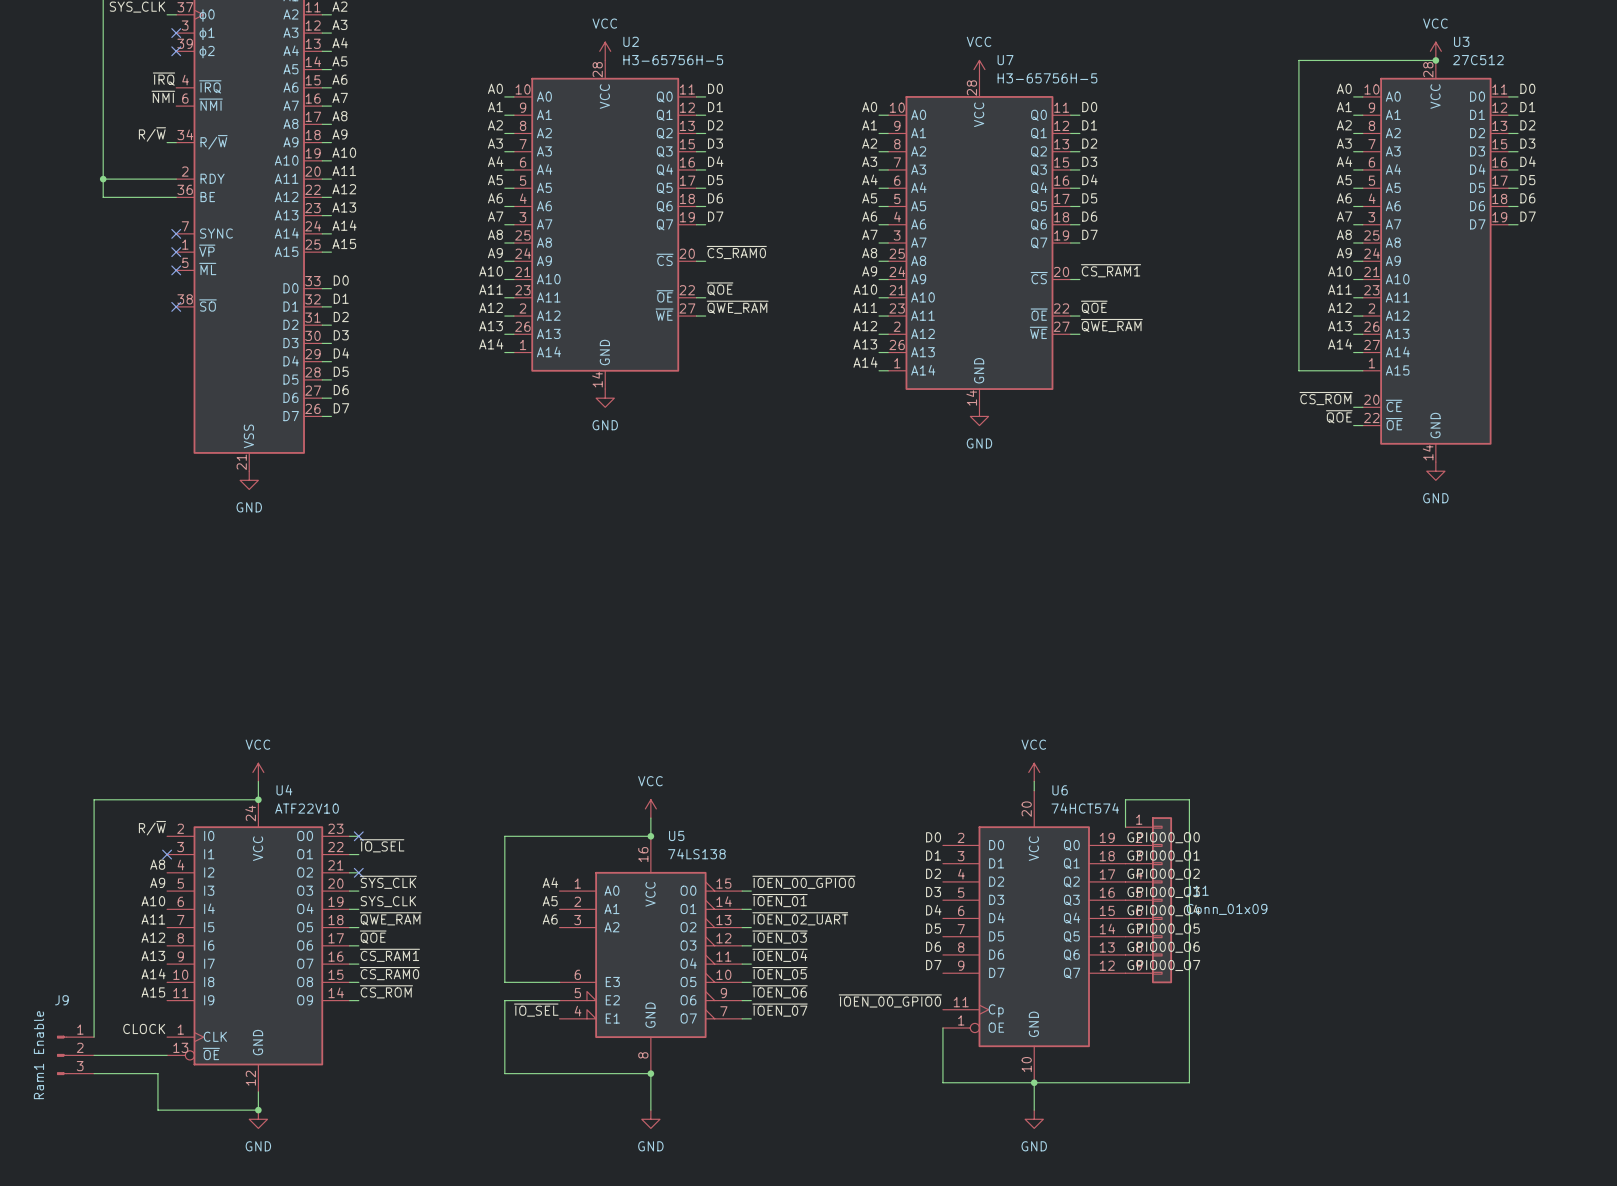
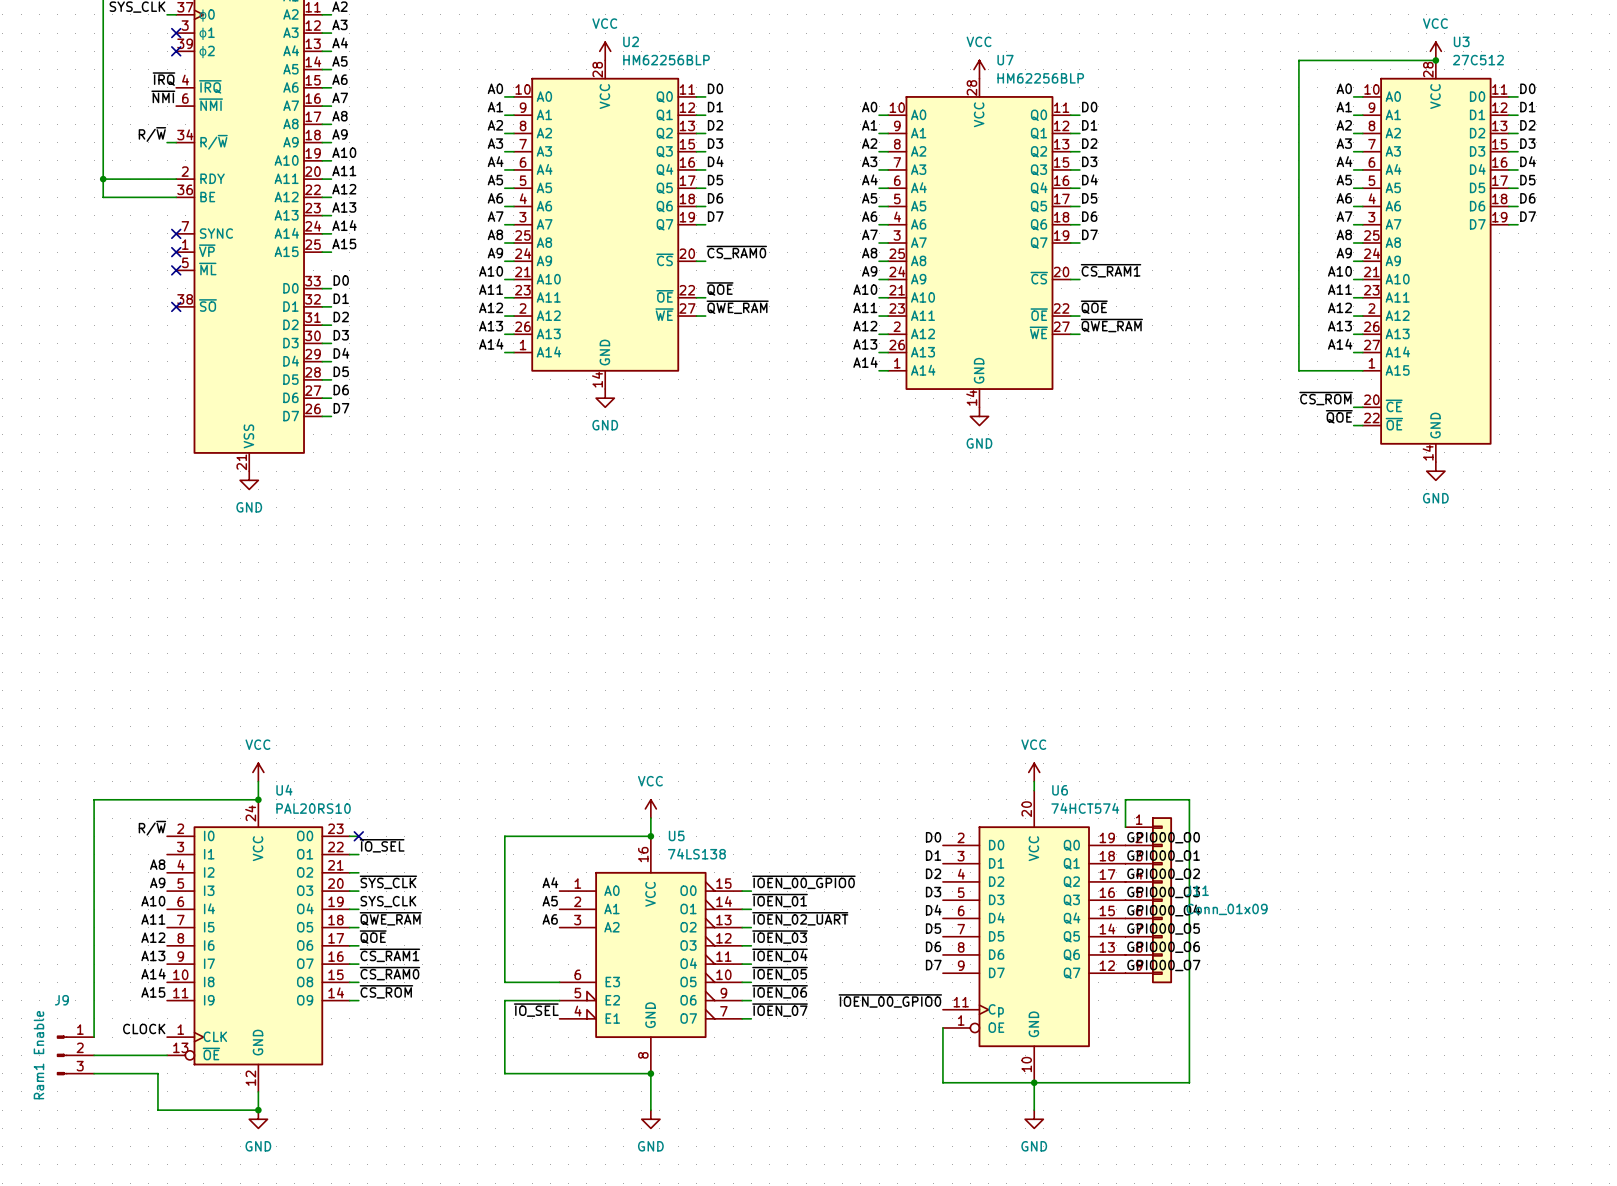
U2 value: H3-65756H-5 (673, 60) -> HM62256BLP (666, 60)
U7 value: H3-65756H-5 (1047, 78) -> HM62256BLP (1040, 78)
U4 value: ATF22V10 (307, 808) -> PAL20RS10 (313, 808)
no-connect mark: (167, 854) -> none
no-connect mark: (358, 872) -> none

